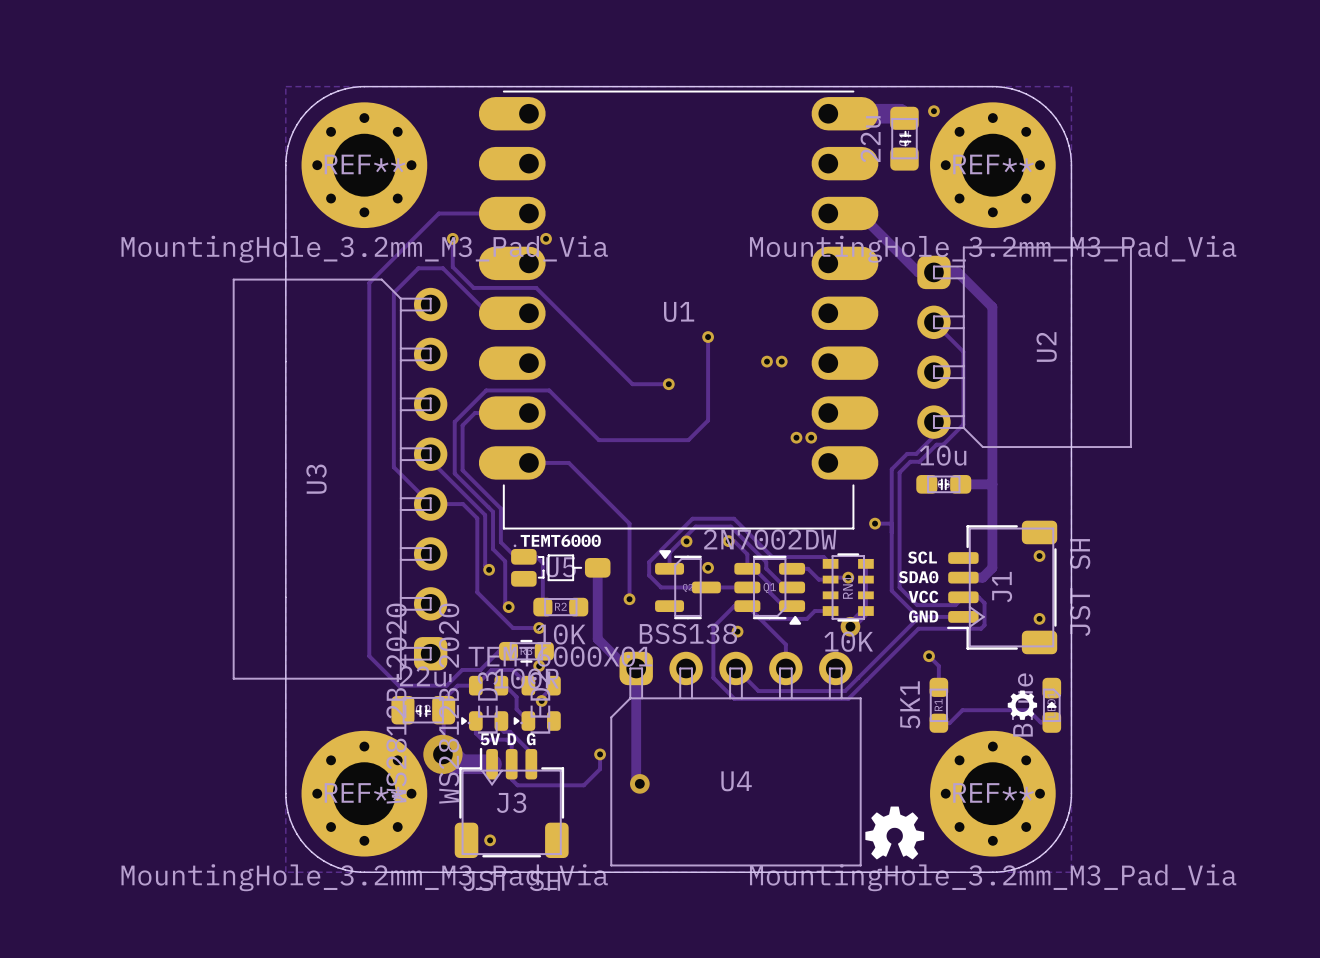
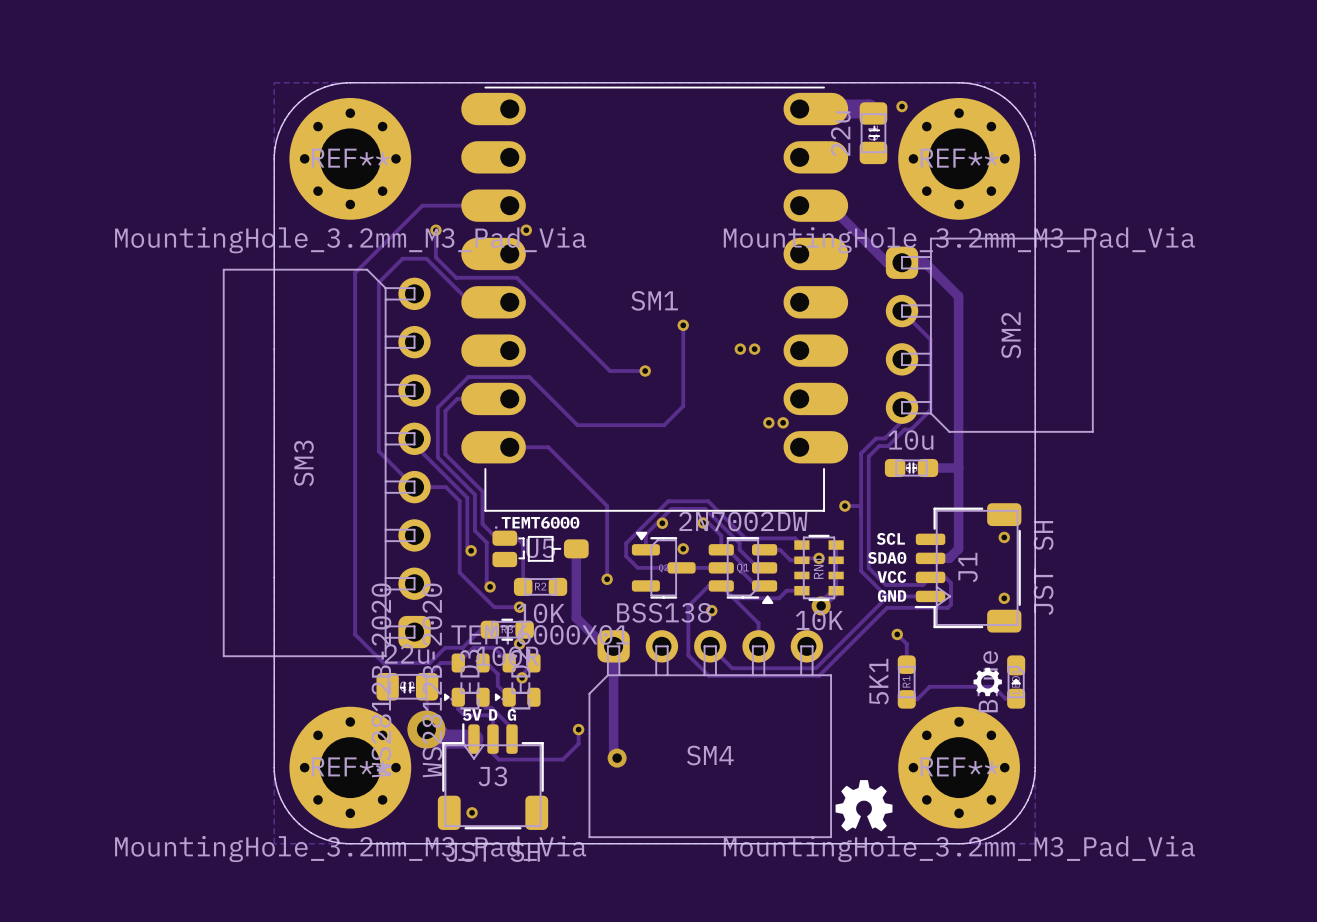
U1 name: U1 (679, 311) -> SM1 (654, 300)
U2 name: U2 (1046, 347) -> SM2 (1011, 335)
U3 name: U3 (316, 479) -> SM3 (303, 463)
U4 name: U4 (736, 781) -> SM4 (710, 755)

